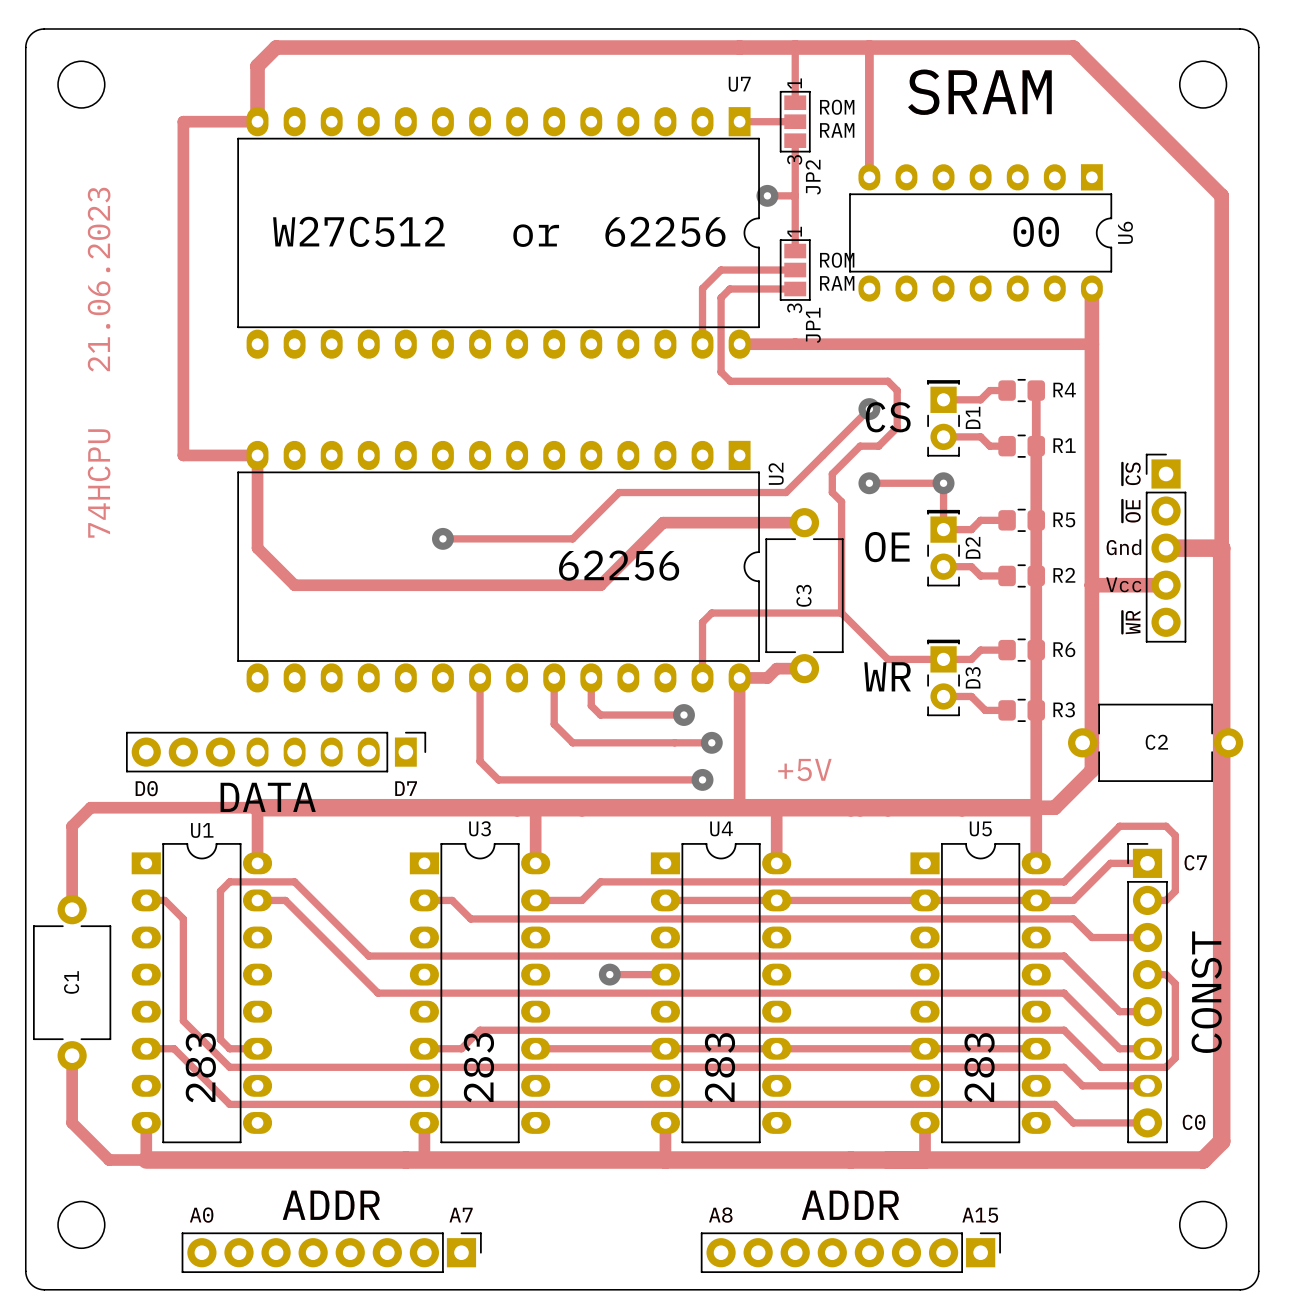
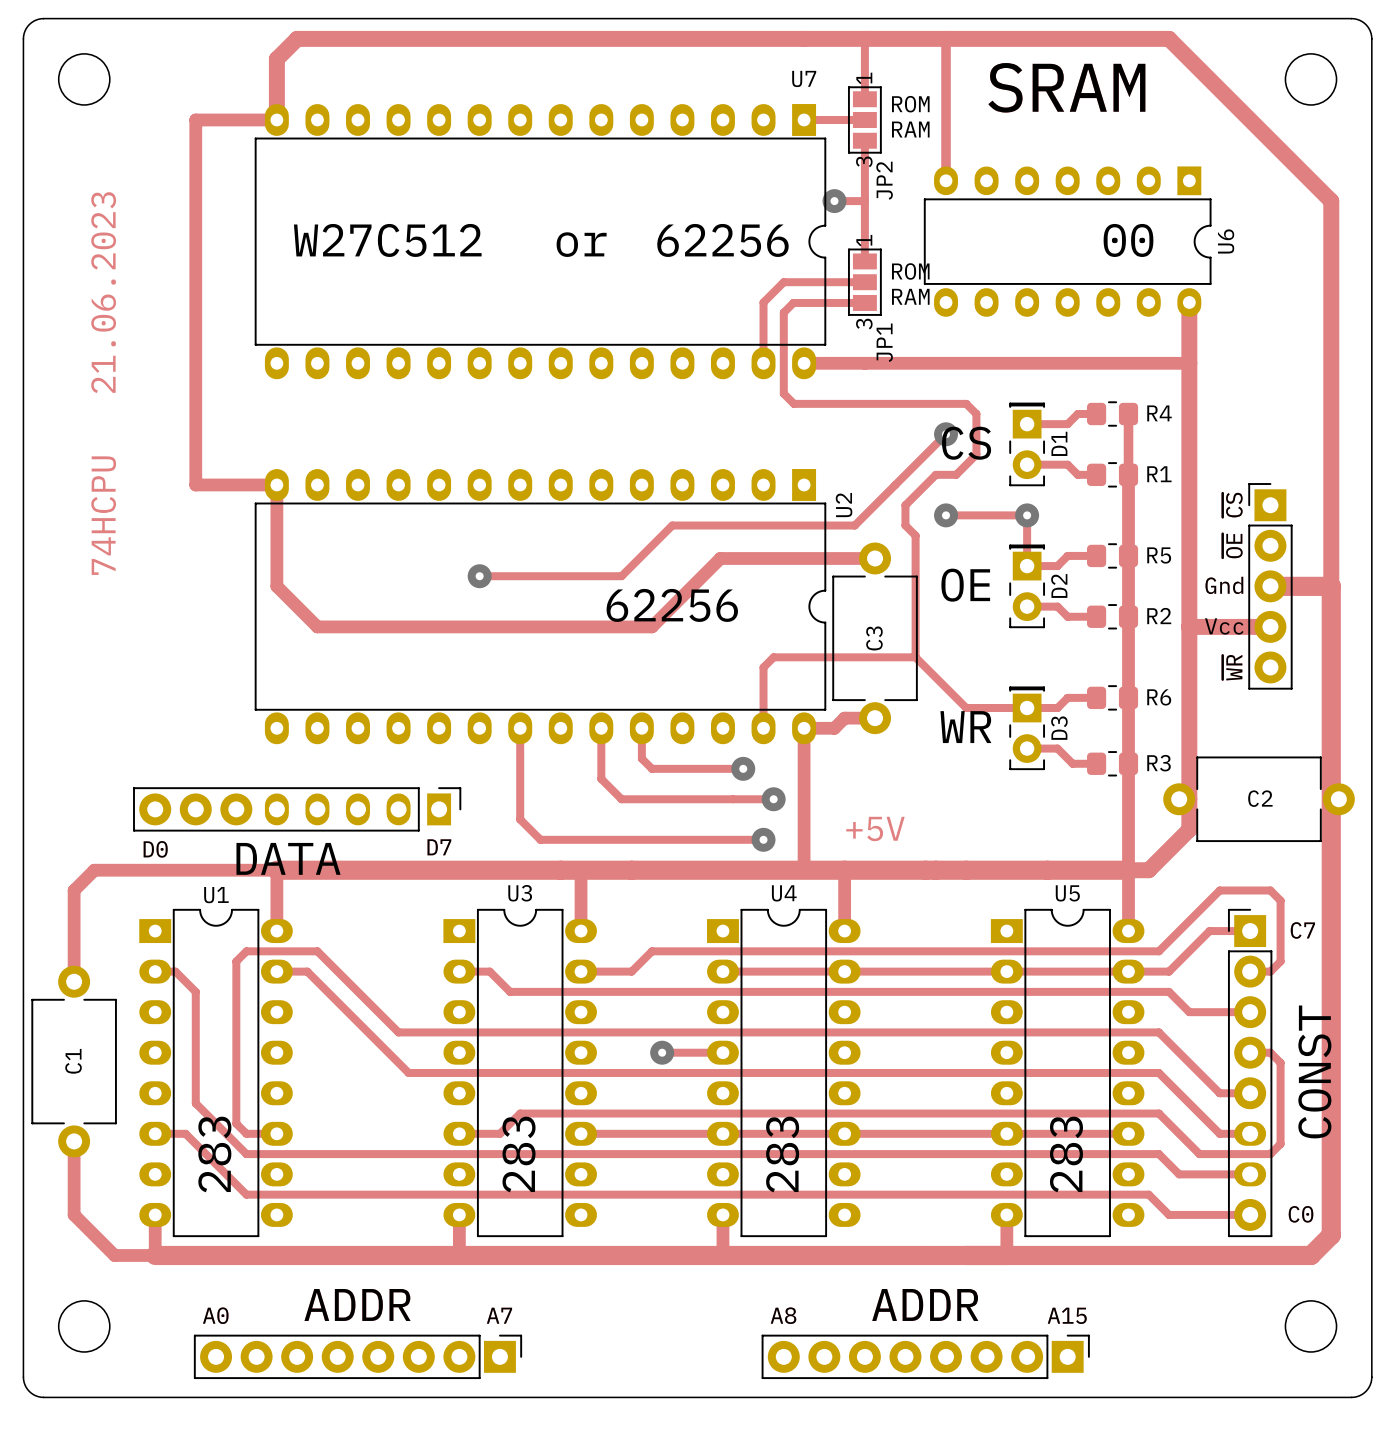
text: none -> D7 (439, 847)
text: D7 (406, 788) -> none

